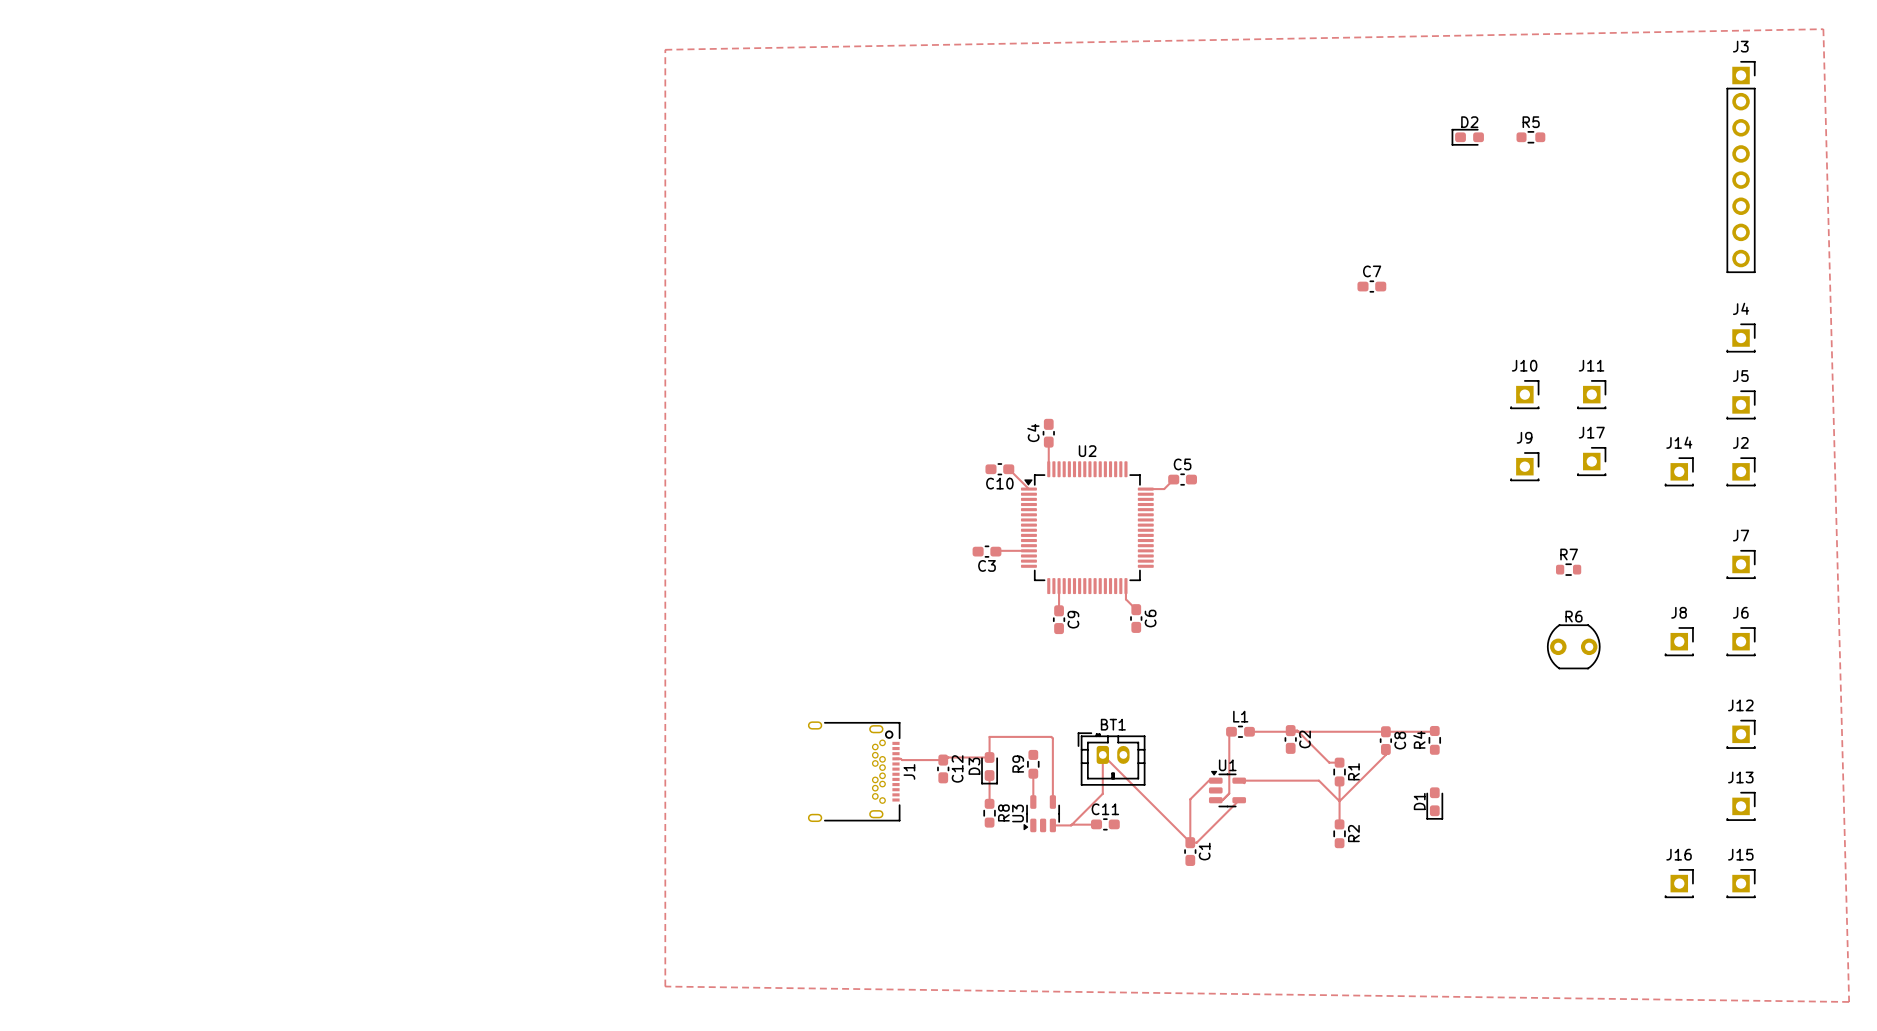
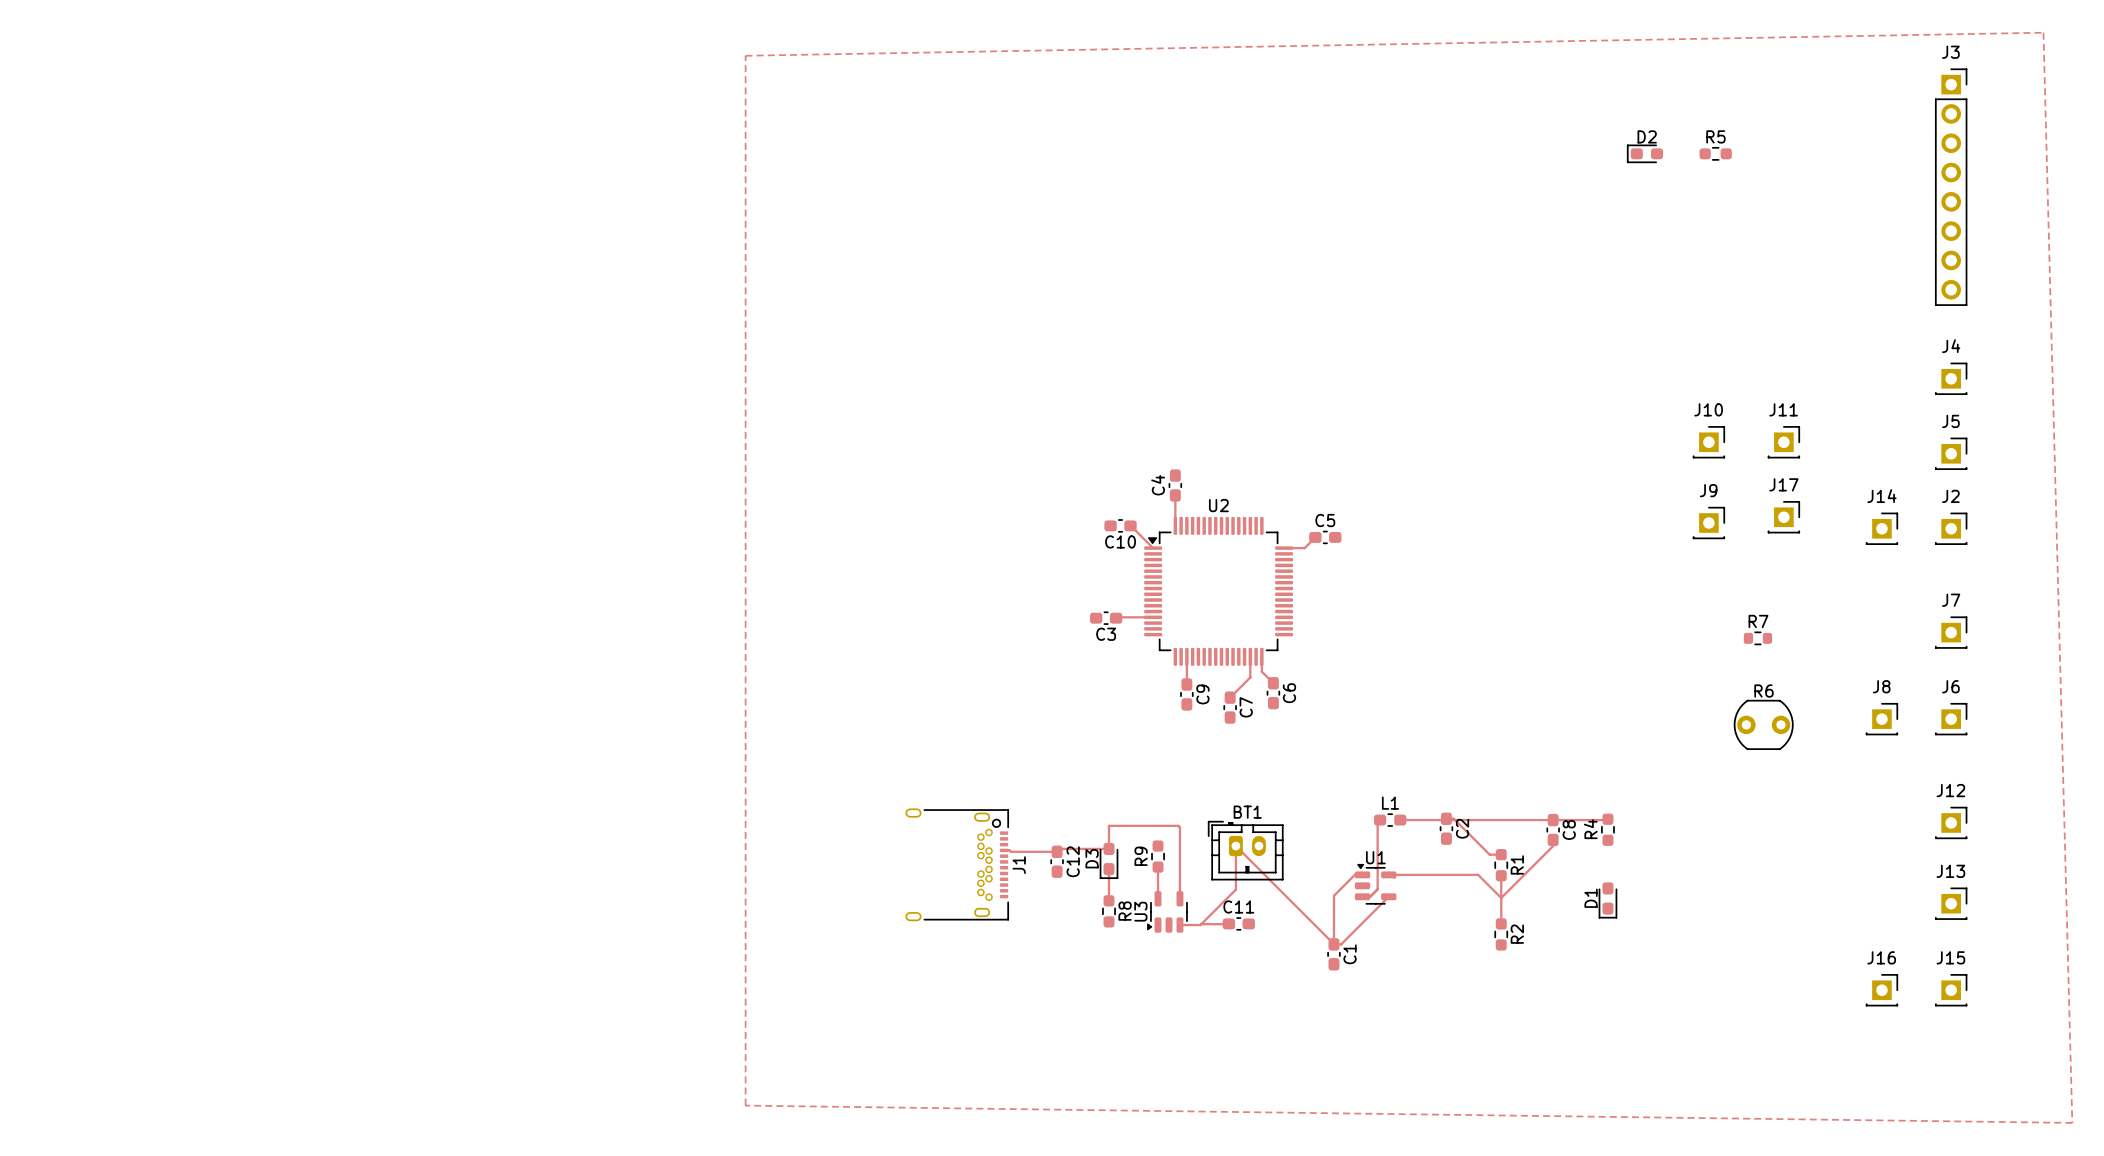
C7 rotation: 0° (1371, 286) -> 90° clockwise (1230, 707)
C7 position: (1371, 286) -> (1230, 707)
top track: none -> (1250, 656) (1250, 677) (1230, 697)

